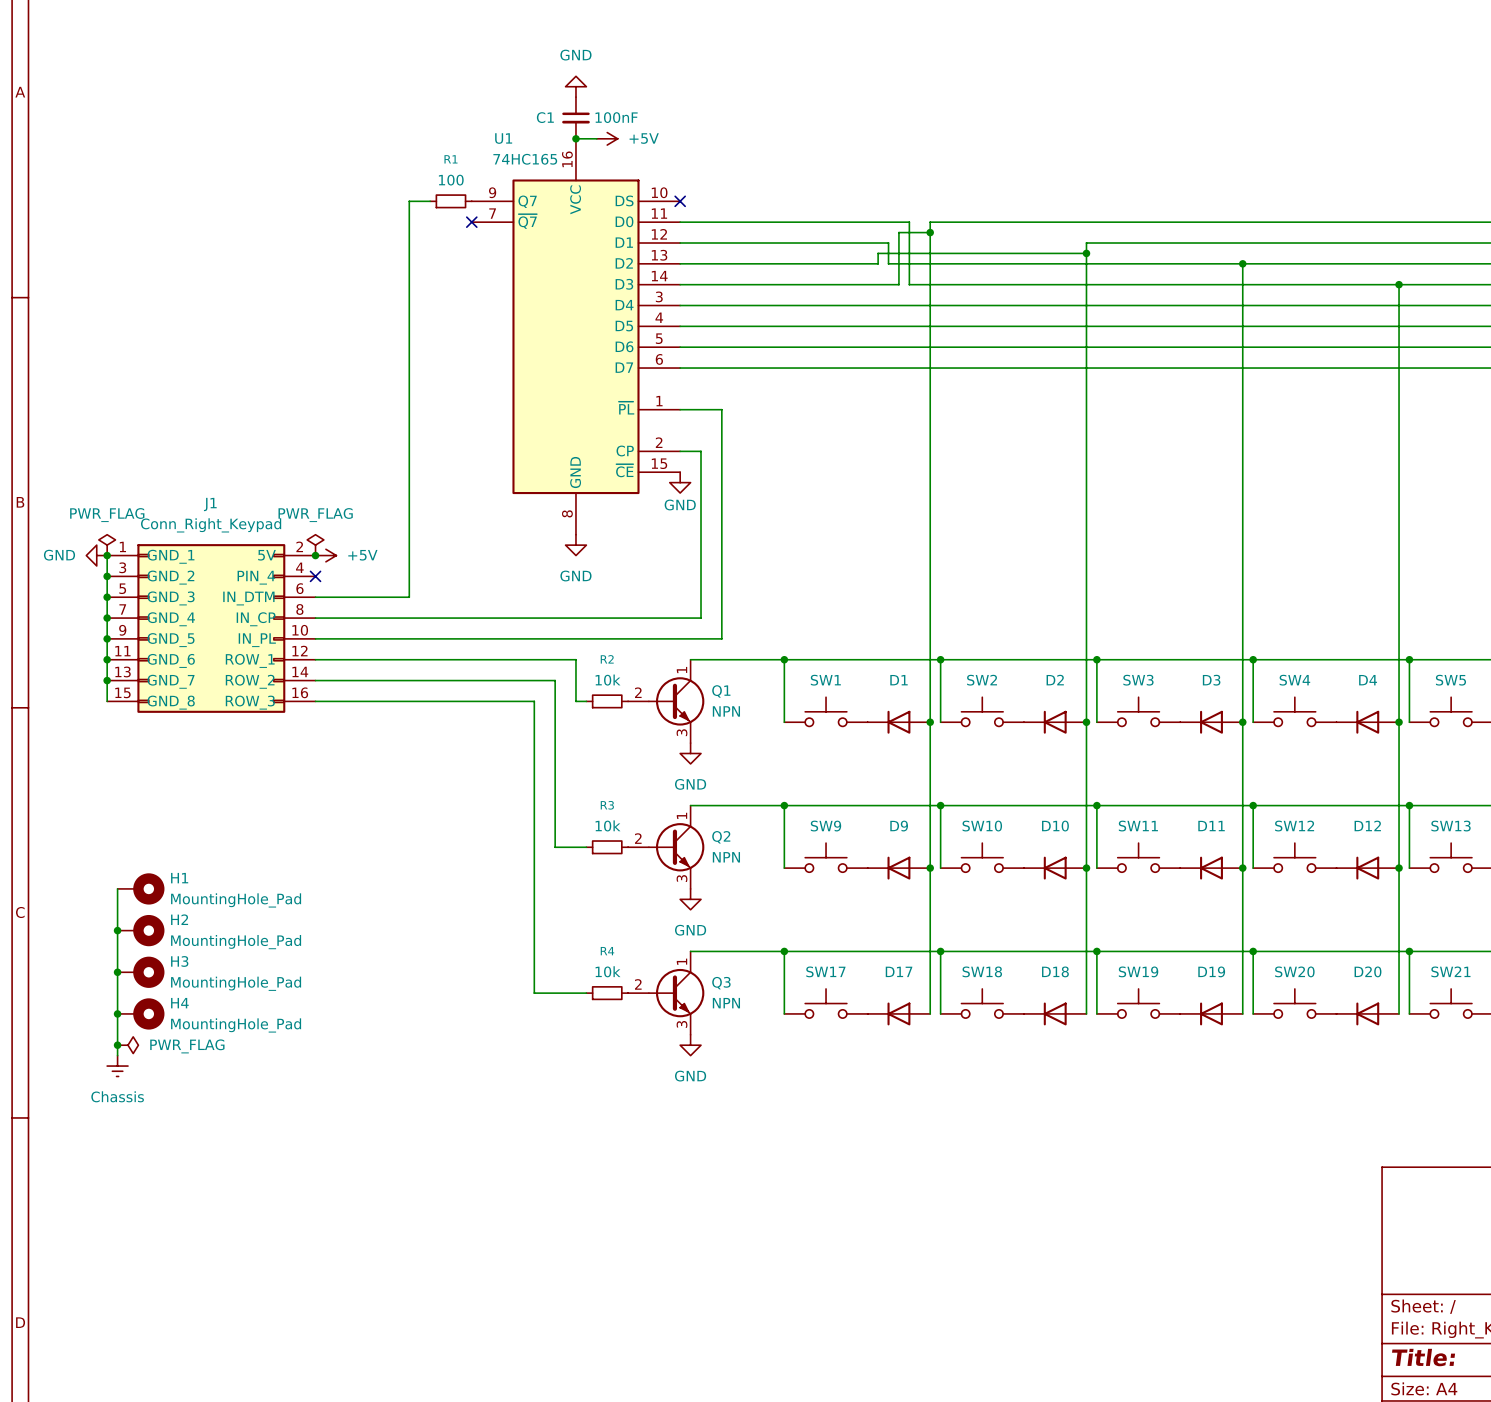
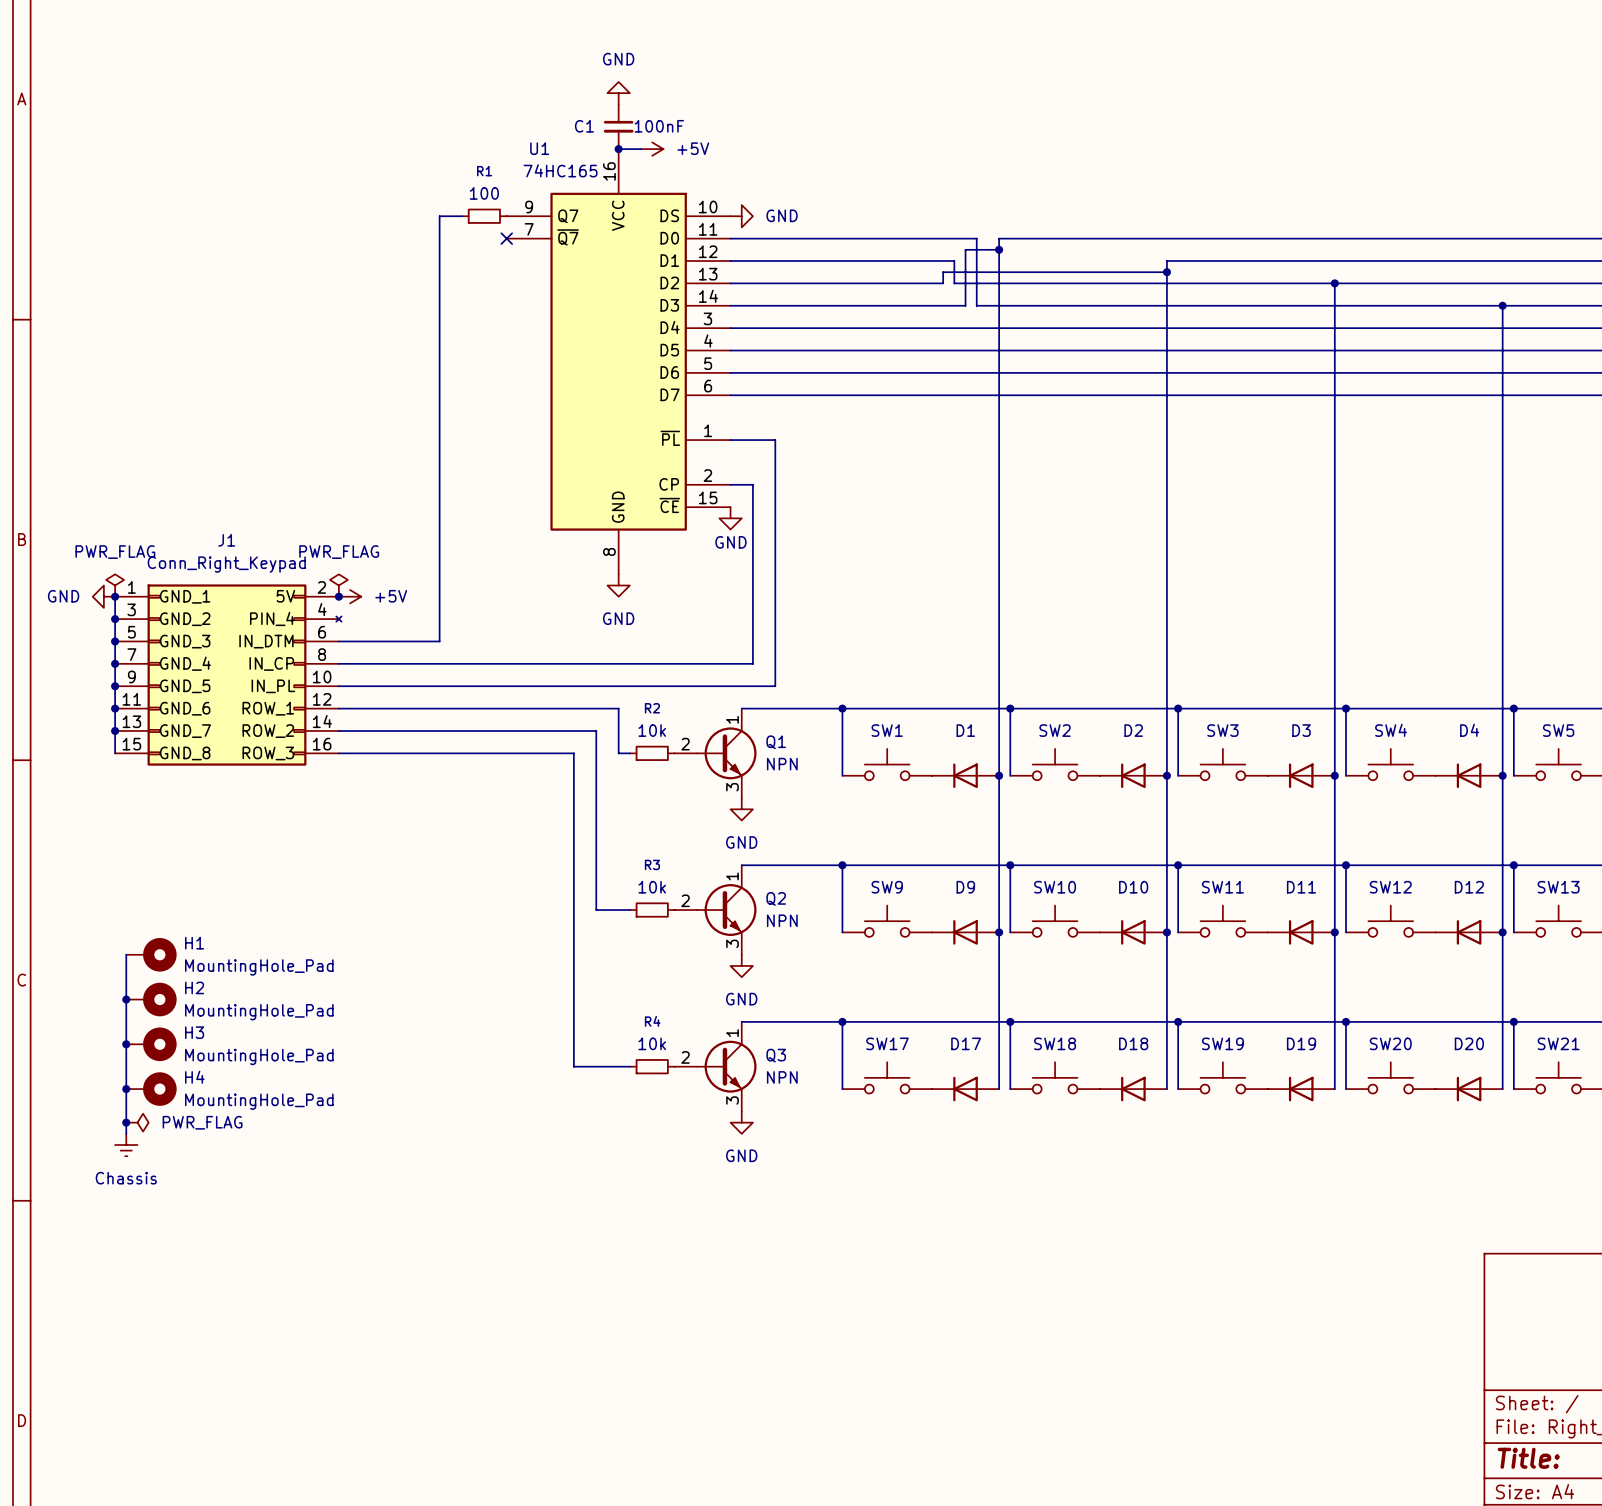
no-connect mark: (680, 201) -> none
power symbol: none -> GND (741, 216)
J1 symbol: [107, 544, 316, 713] -> [115, 584, 342, 766]
no-connect mark: (315, 576) -> none

